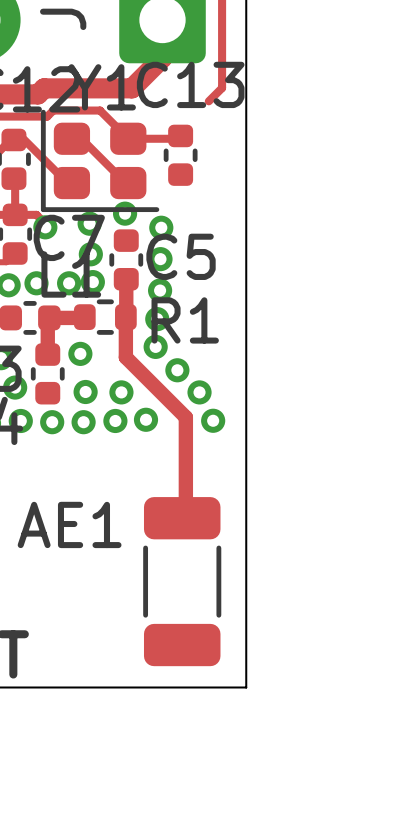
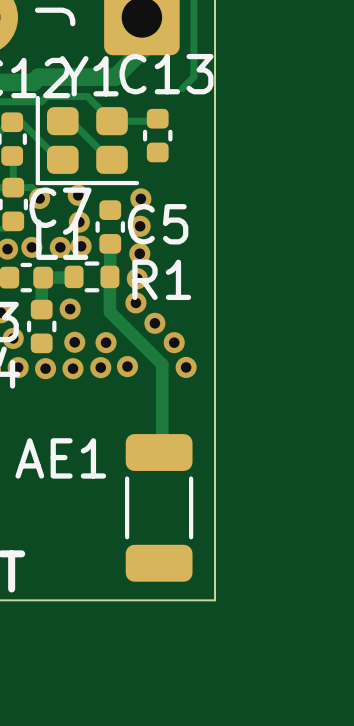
via: (125, 213) -> none

